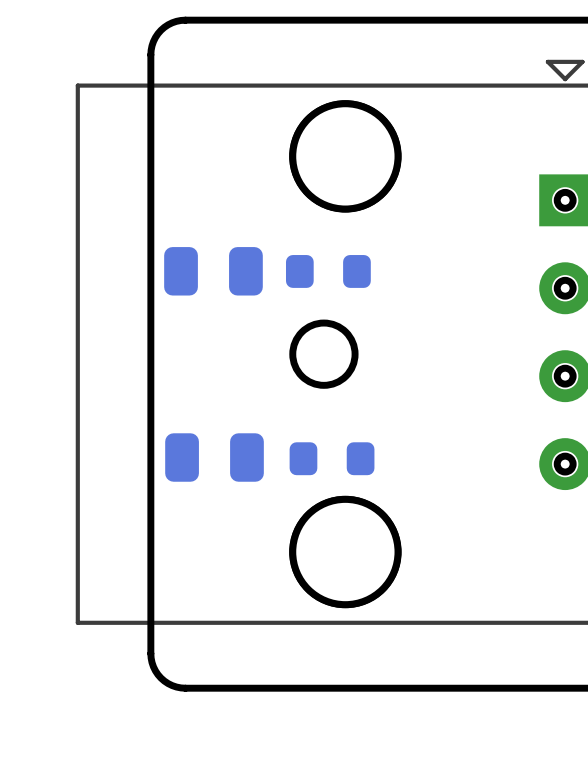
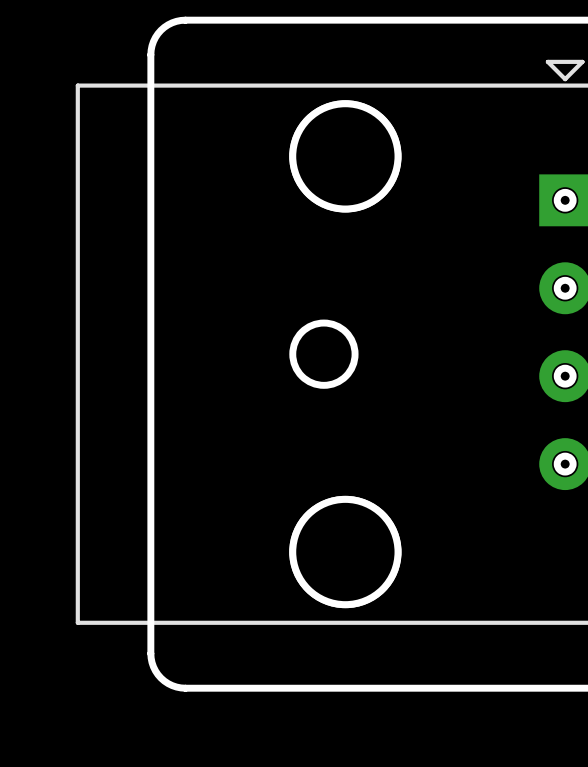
part: (213, 271) -> none
part: (328, 271) -> none
part: (214, 457) -> none
part: (332, 458) -> none

